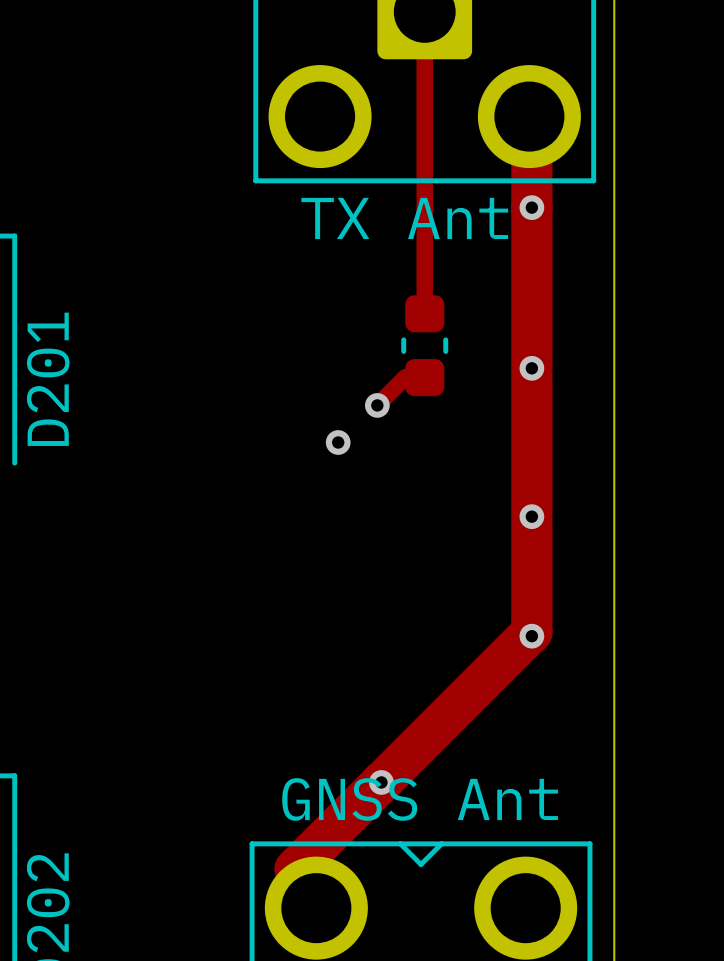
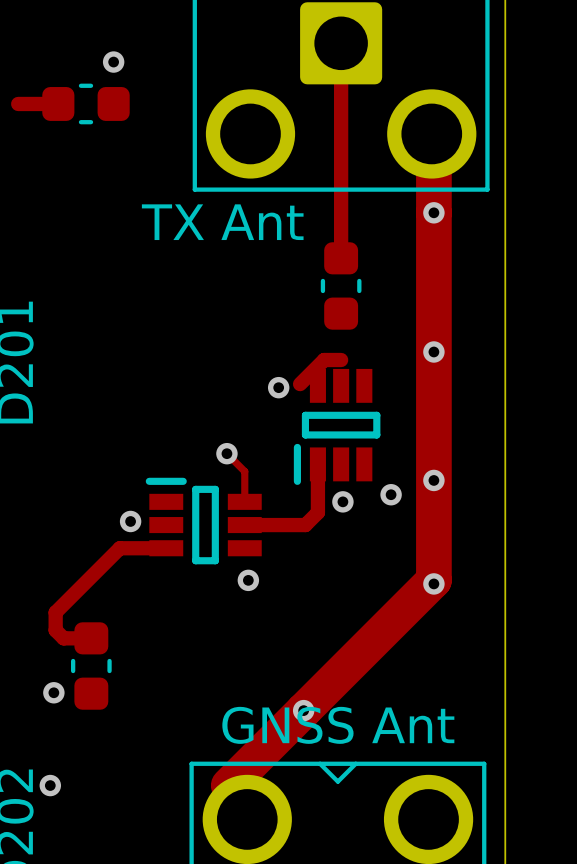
via: none -> (113, 62)
track: none -> (18, 103) (58, 103)
part: none -> (85, 103)
part text position: TX Ant (404, 218) -> TX Ant (222, 222)
track: (424, 260) (424, 313) -> none
part position: (424, 345) -> (341, 285)
via position: (377, 405) -> (278, 387)
via: (338, 442) -> none
part: none -> (337, 426)
track: none -> (226, 453) (244, 471) (244, 501)
via: none -> (226, 453)
track: none -> (317, 464) (317, 512) (305, 525) (244, 525)
via: none -> (391, 494)
via: none -> (342, 501)
part: none -> (203, 521)
via: none -> (130, 521)
track: none -> (166, 548) (119, 548) (55, 612) (55, 630) (63, 638) (91, 638)
via: none -> (248, 580)
part: none -> (91, 666)
via: none -> (53, 692)
via: none -> (50, 785)

